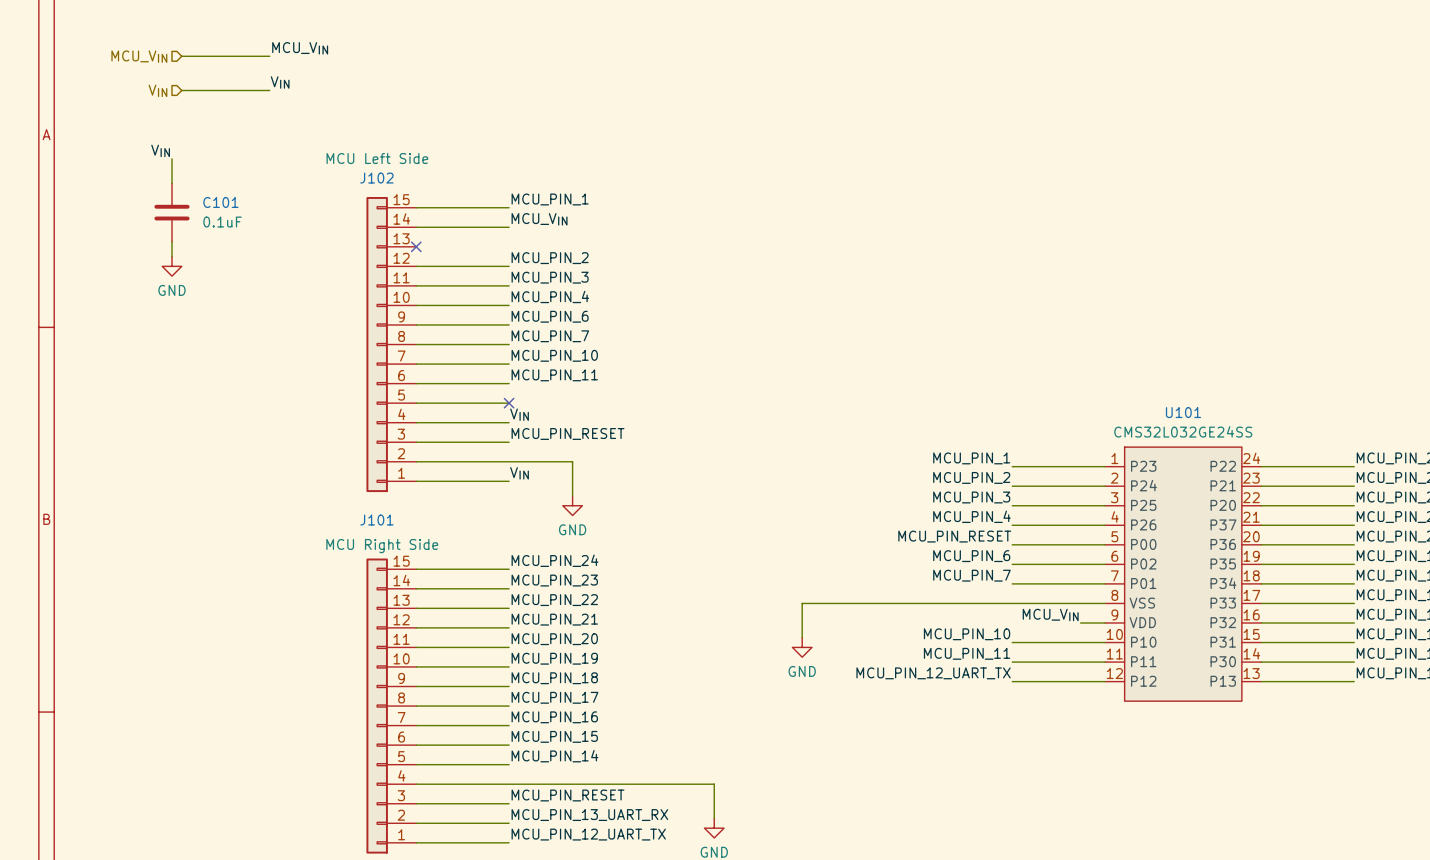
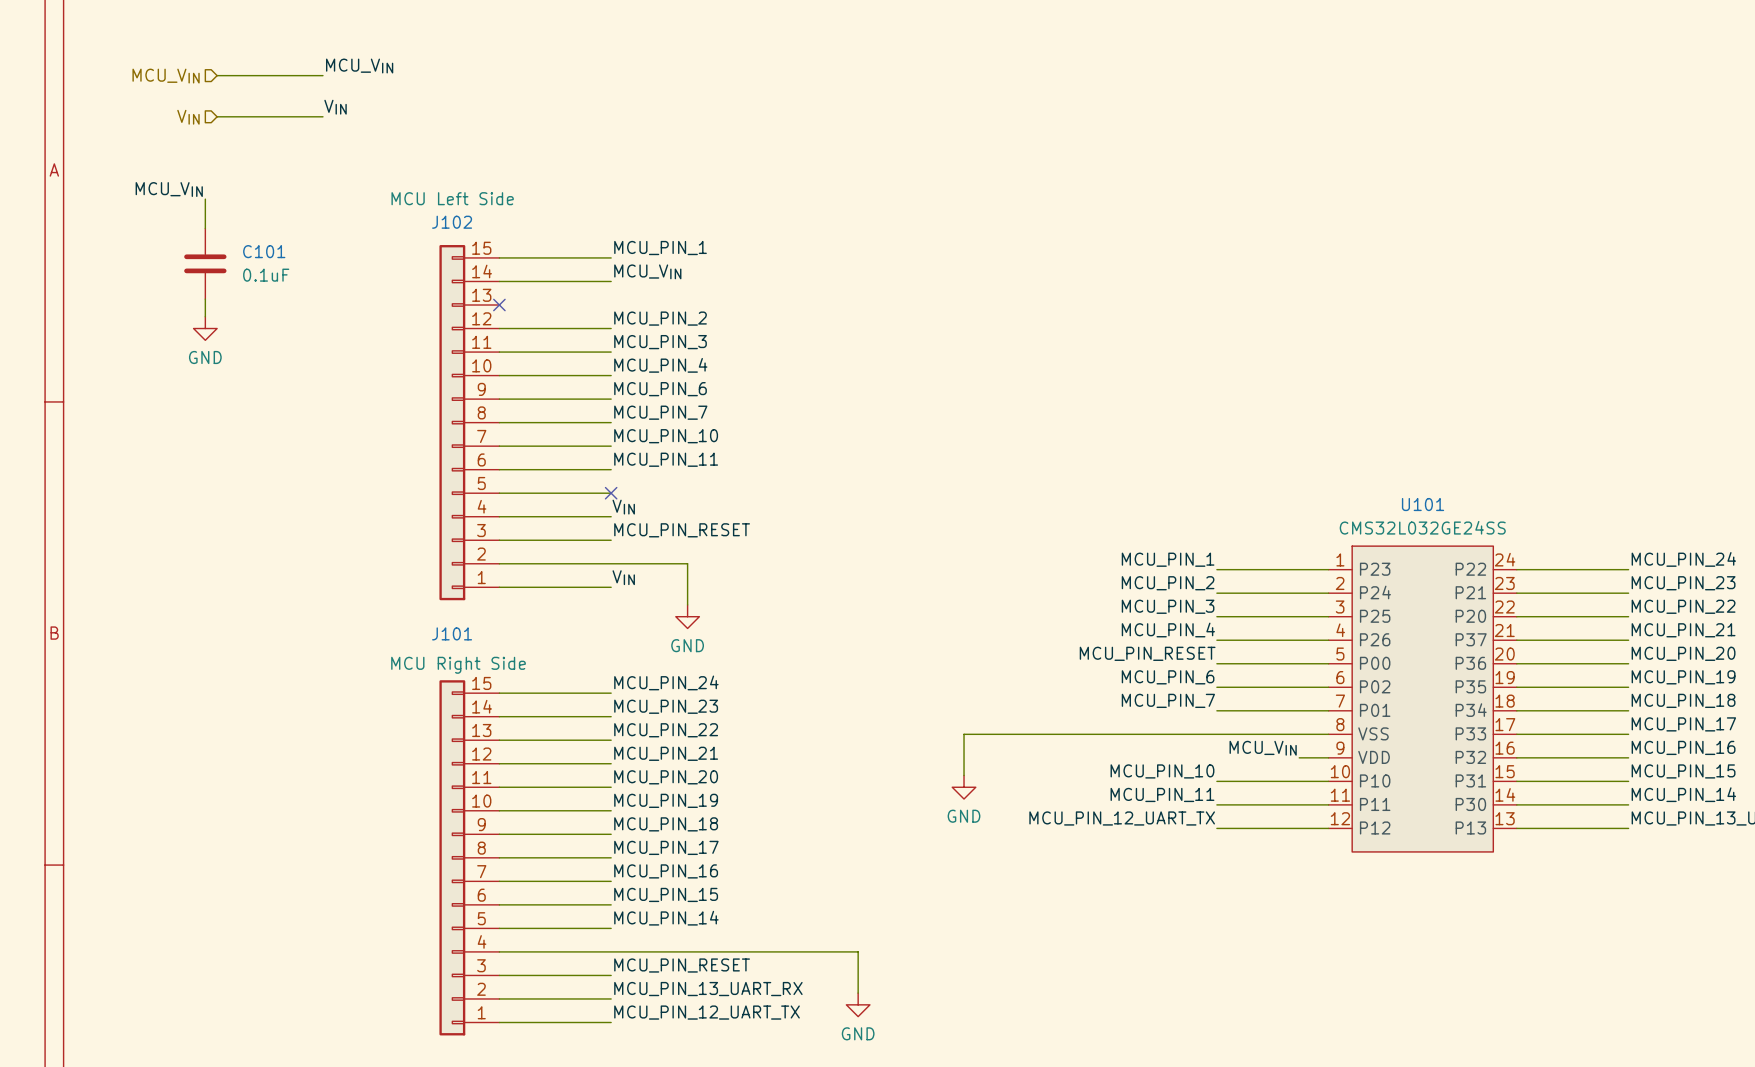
label: VIN (160, 150) -> MCU_VIN (169, 189)

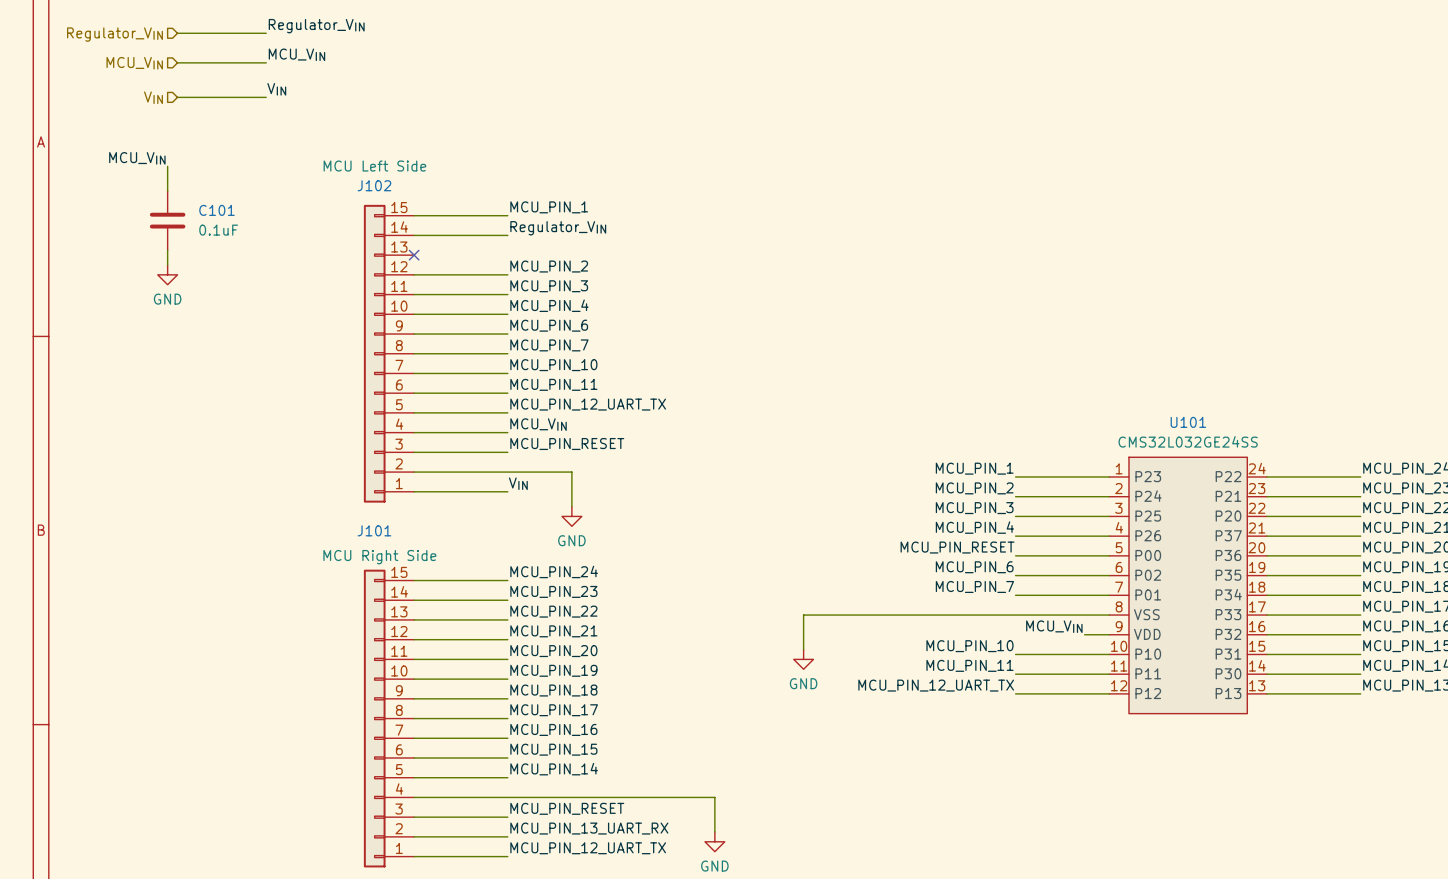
label: none -> Regulator_VIN (316, 26)
wire: none -> (177, 33) (266, 33)
hierarchical label: none -> Regulator_VIN (114, 34)
label: MCU_VIN (647, 271) -> Regulator_VIN (558, 228)
label: none -> MCU_PIN_12_UART_TX (588, 404)
no-connect mark: (611, 493) -> none
label: VIN (623, 507) -> MCU_VIN (538, 424)

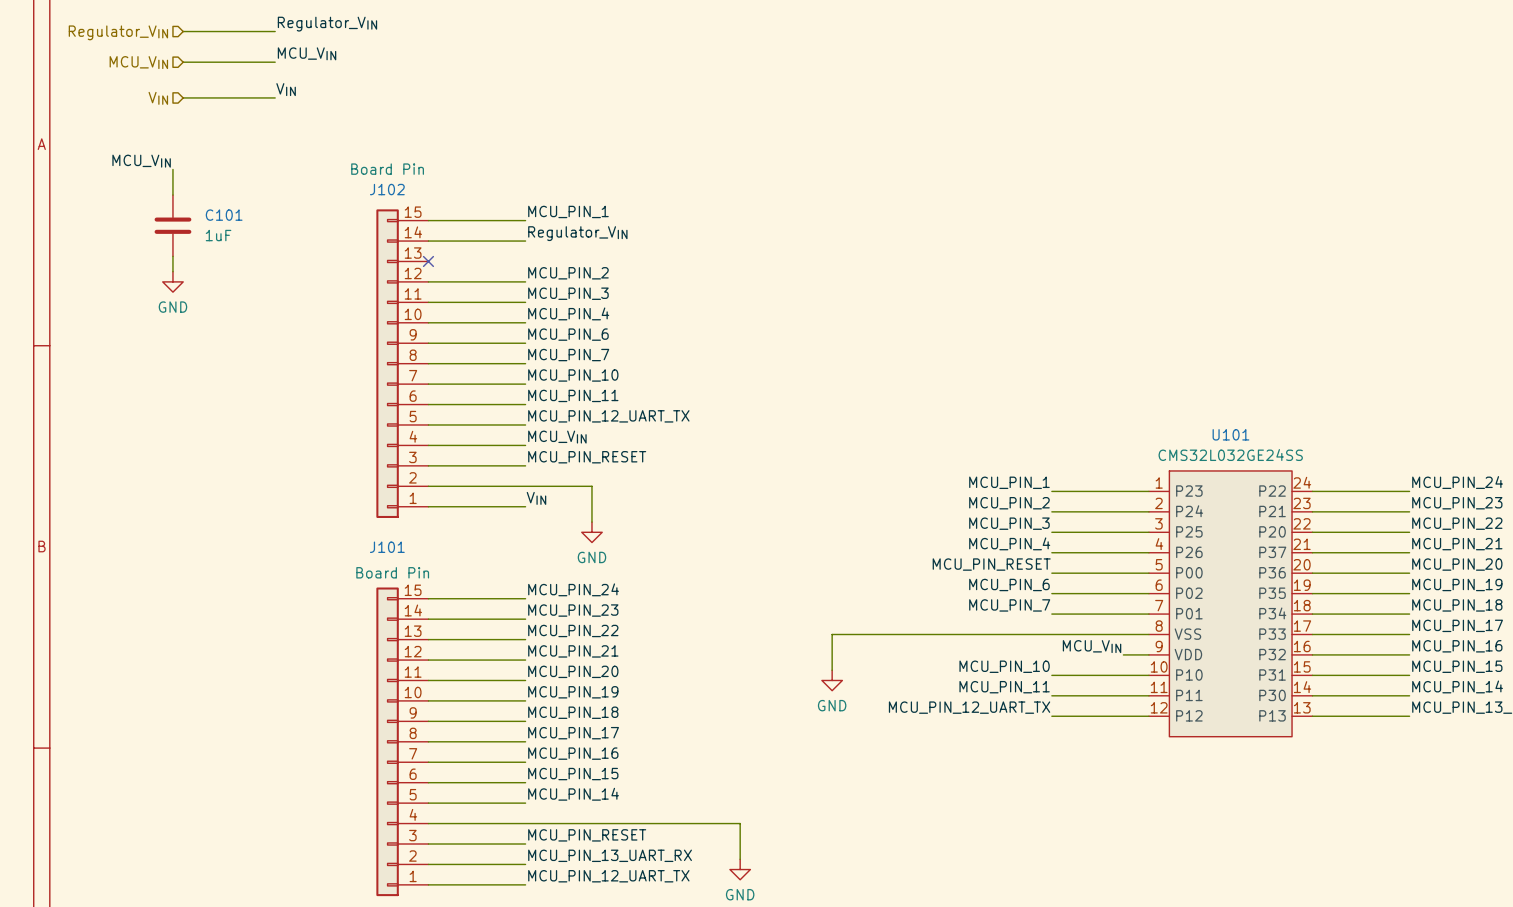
J102 value: MCU Left Side (374, 166) -> Board Pin (387, 169)
C101 value: 0.1uF (218, 230) -> 1uF (218, 235)
J101 value: MCU Right Side (379, 557) -> Board Pin (392, 572)

